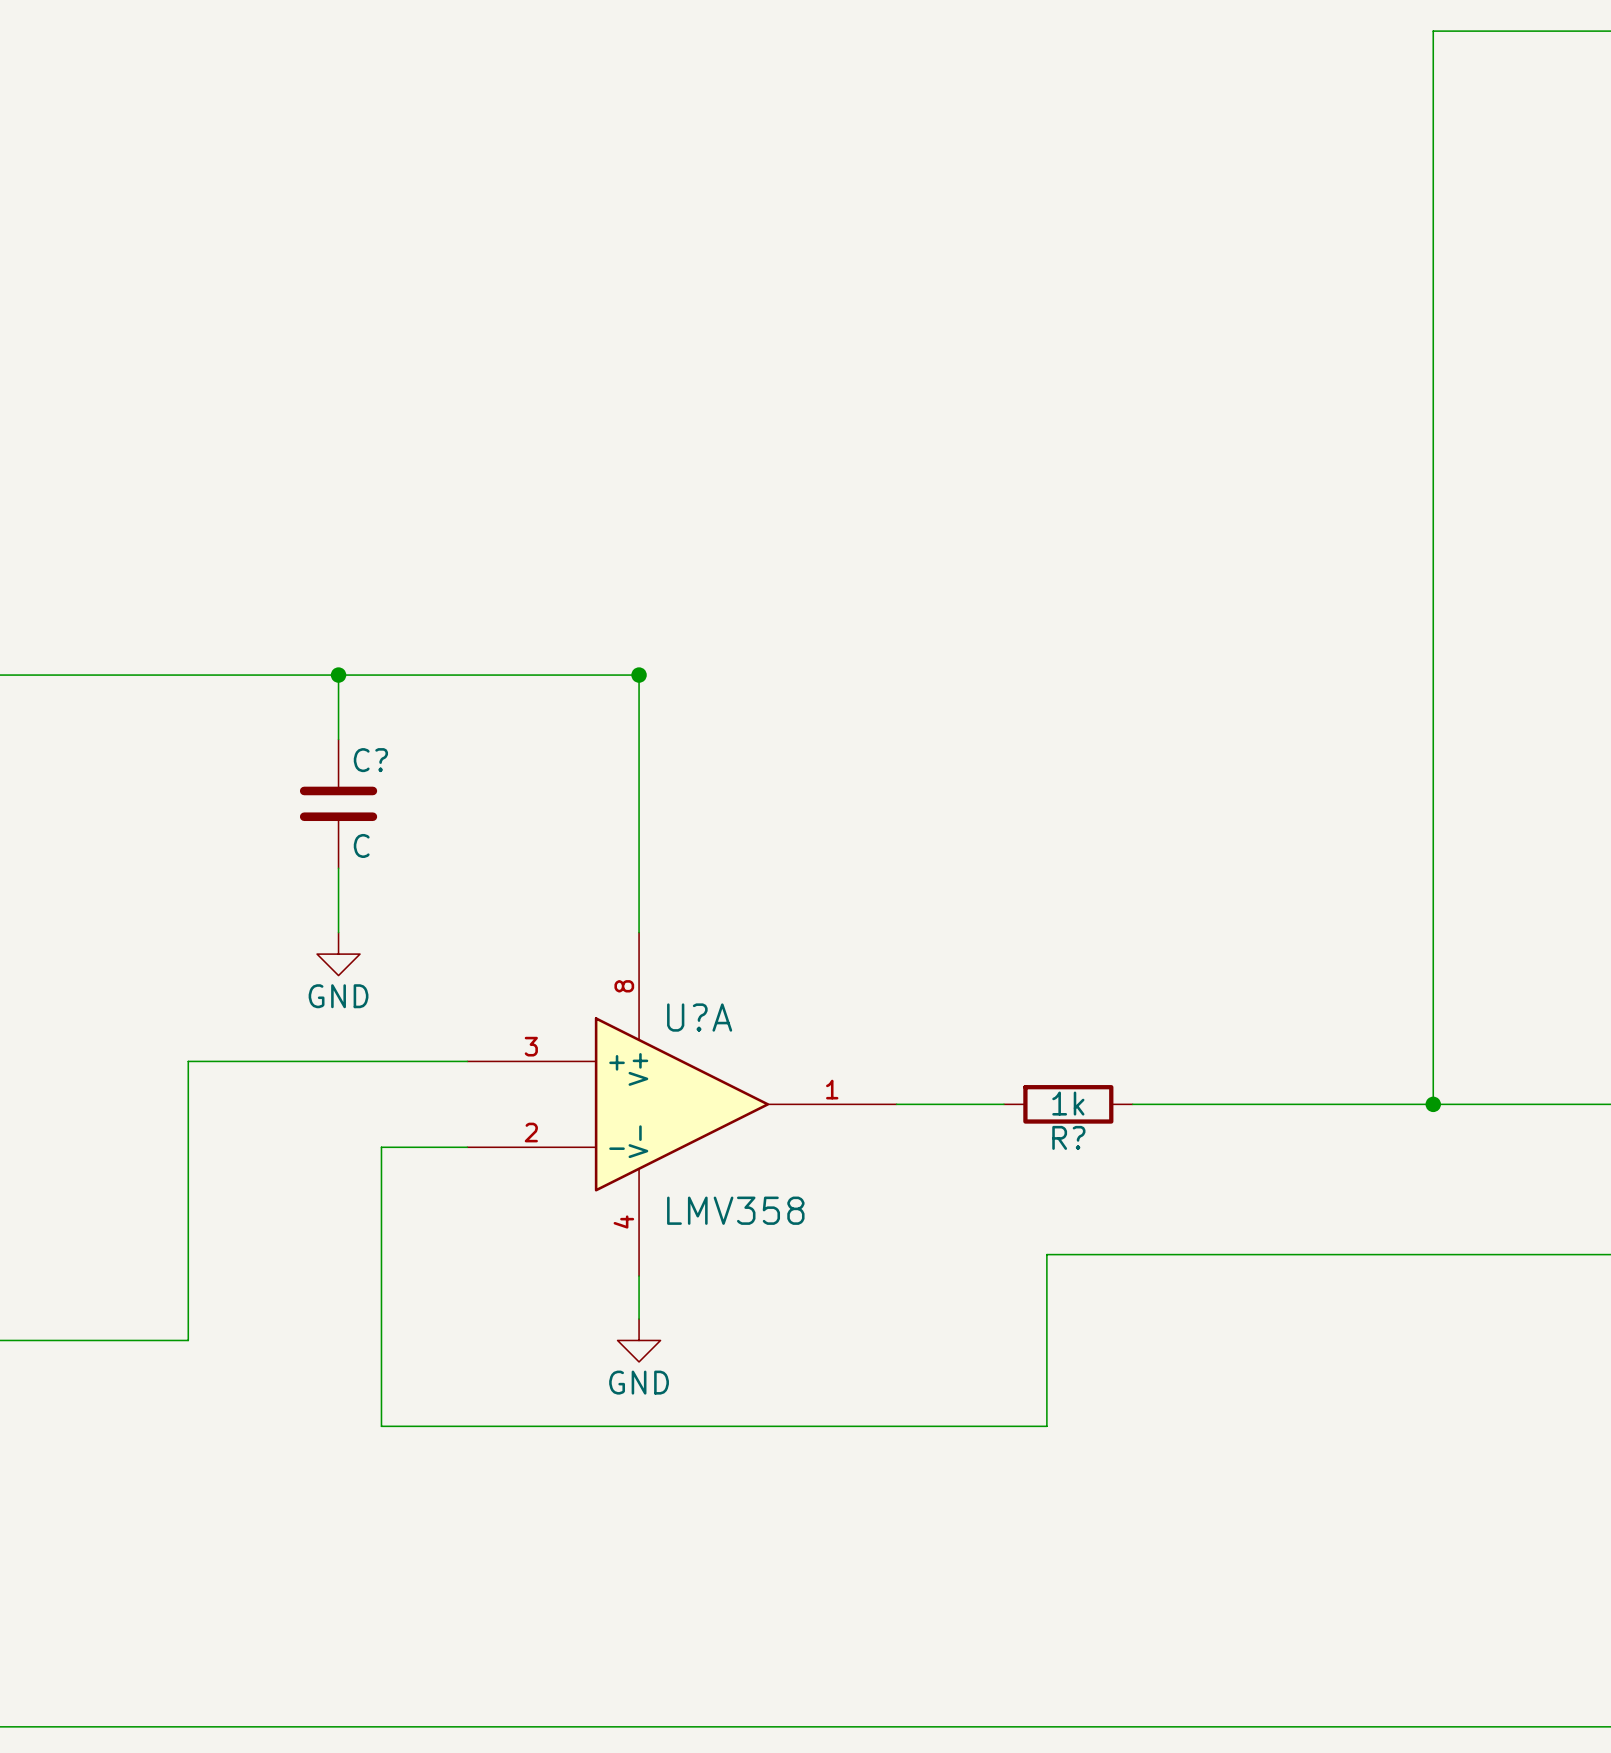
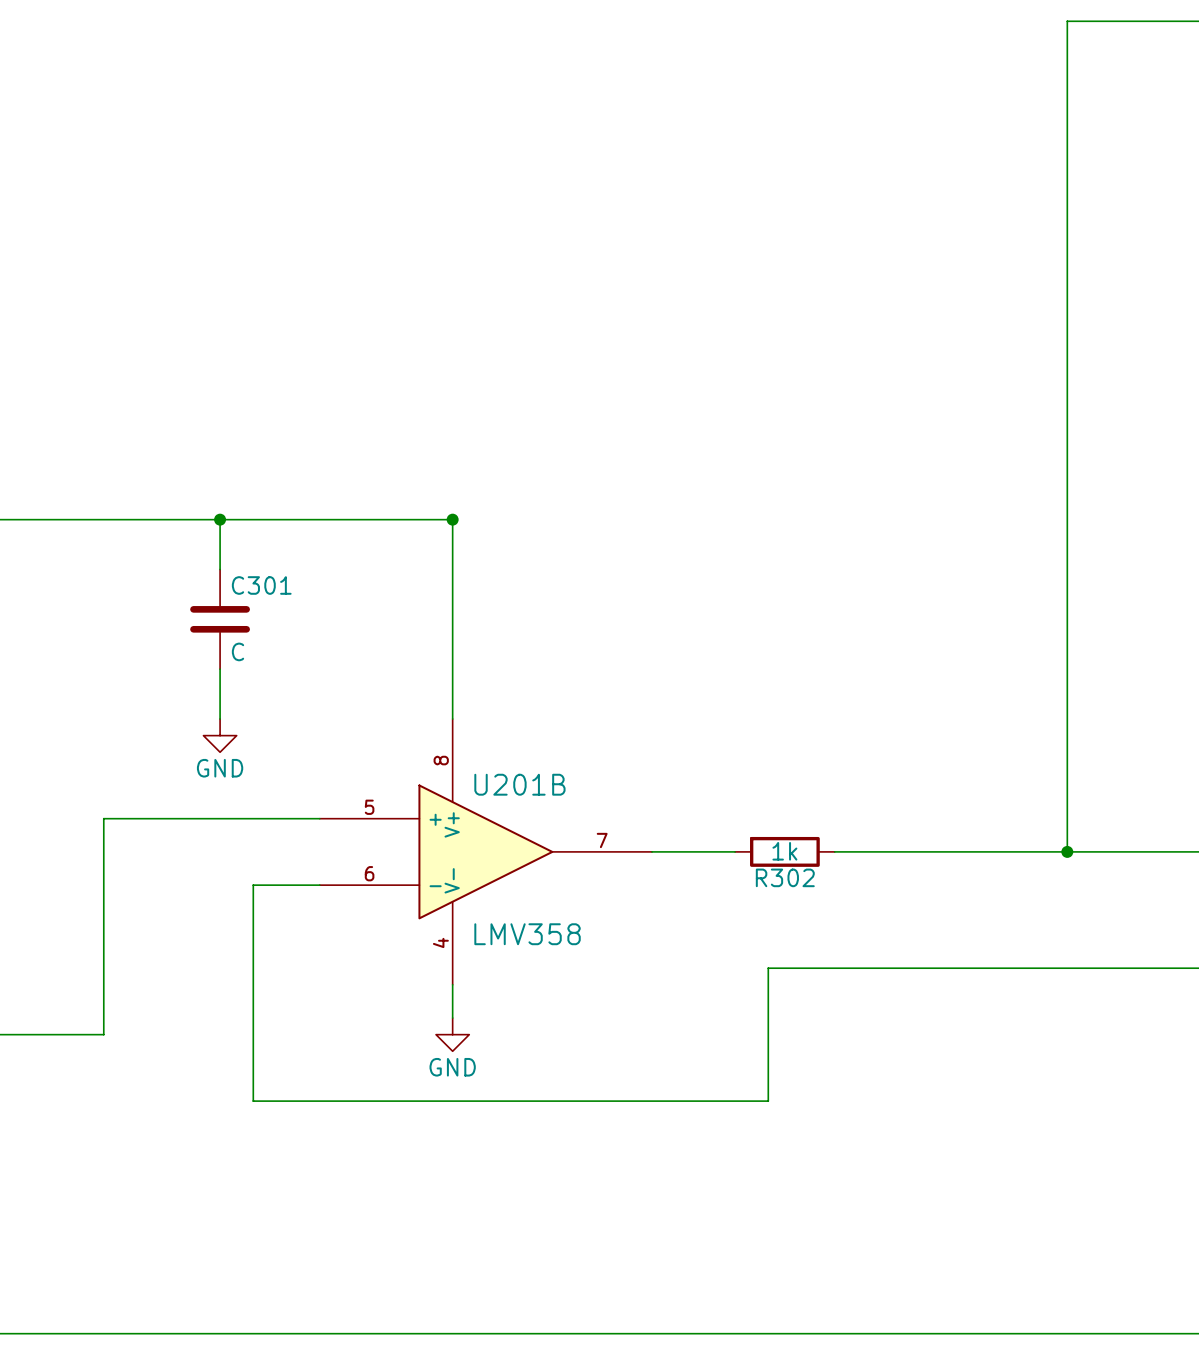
C? name: C? (370, 760) -> C301 (261, 585)
U?A name: U?A (699, 1017) -> U201B (519, 784)
U?A pin number: 3 (531, 1046) -> 5 (369, 807)
U?A pin number: 1 (832, 1089) -> 7 (602, 840)
U?A pin number: 2 (531, 1132) -> 6 (369, 873)
R? name: R? (1068, 1137) -> R302 (785, 877)

